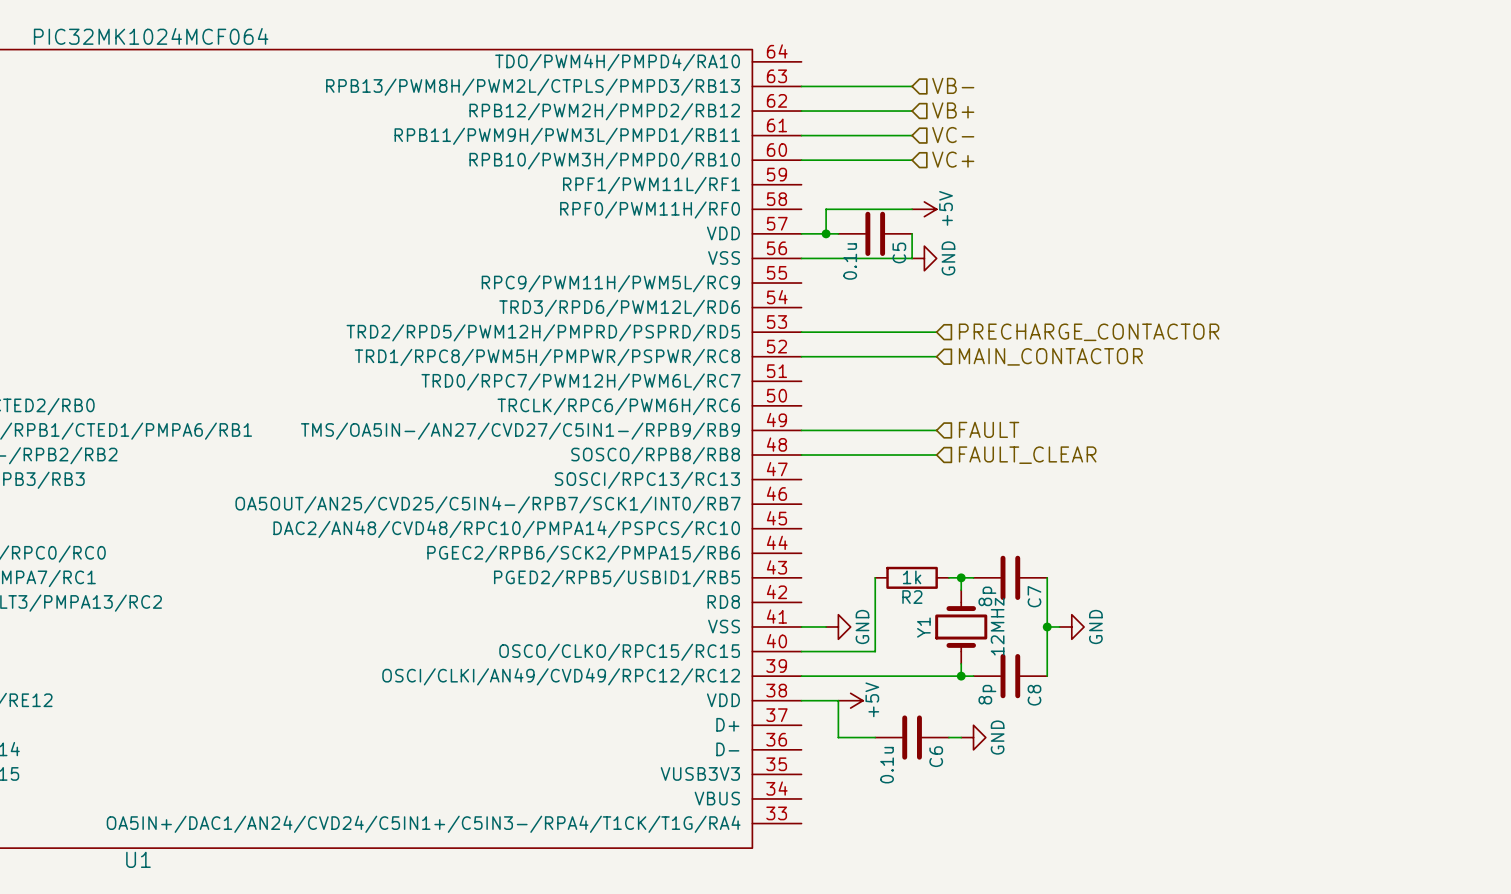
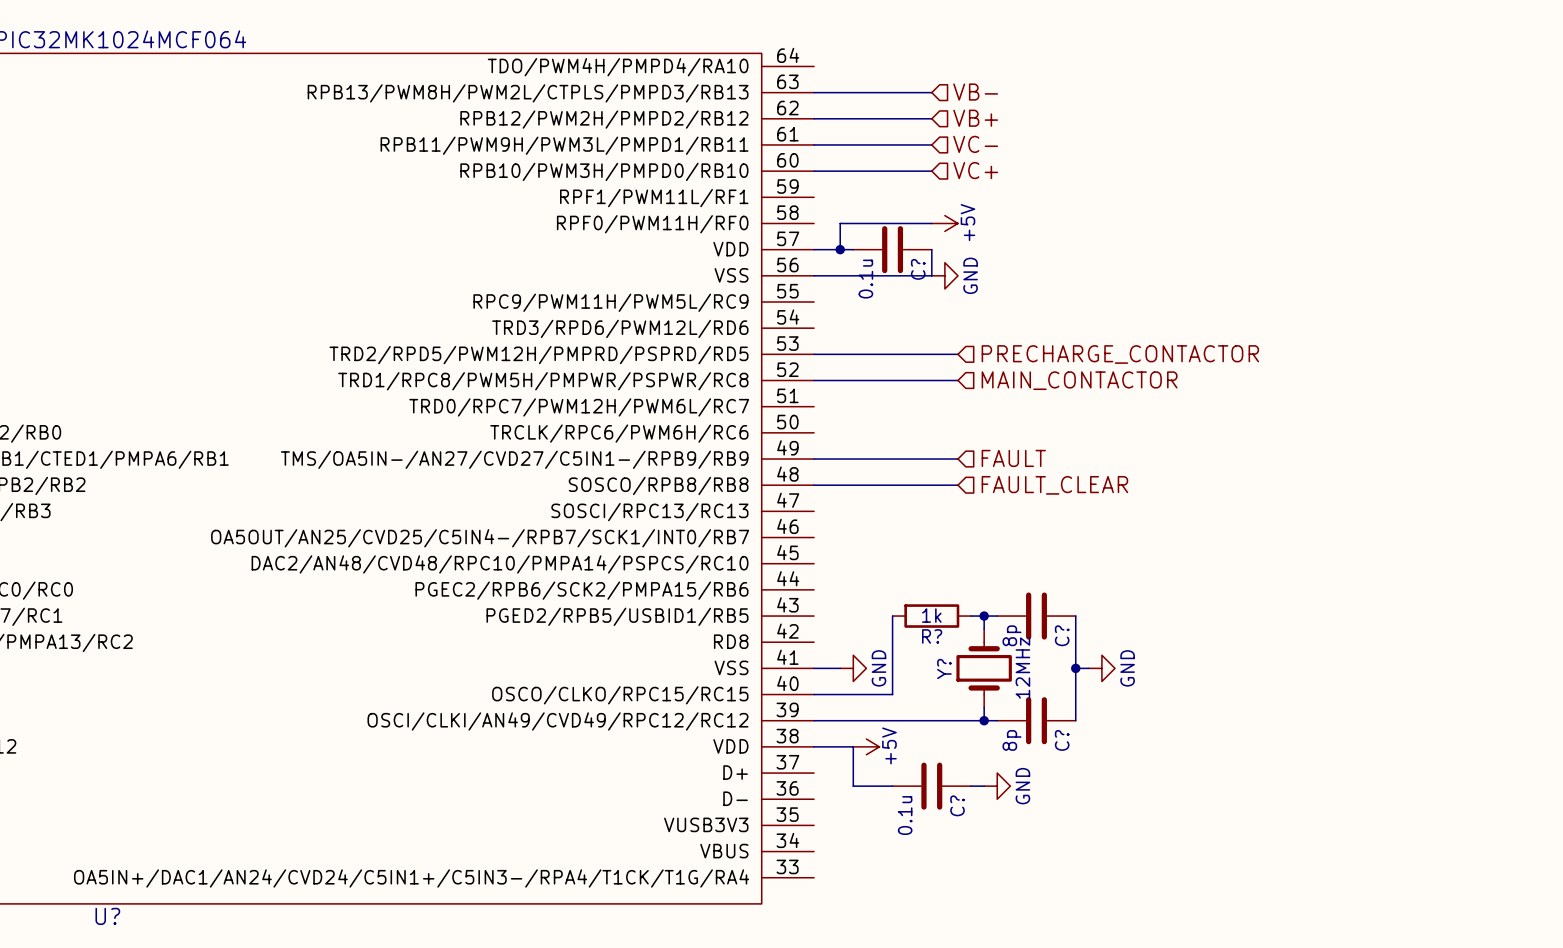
C5 name: C5 (899, 252) -> C? (918, 269)
C7 name: C7 (1034, 596) -> C? (1062, 635)
R2 name: R2 (912, 597) -> R? (932, 636)
Y1 name: Y1 (923, 627) -> Y? (944, 669)
C8 name: C8 (1034, 695) -> C? (1062, 740)
C6 name: C6 (936, 756) -> C? (957, 805)
U1 name: U1 (138, 859) -> U? (107, 916)

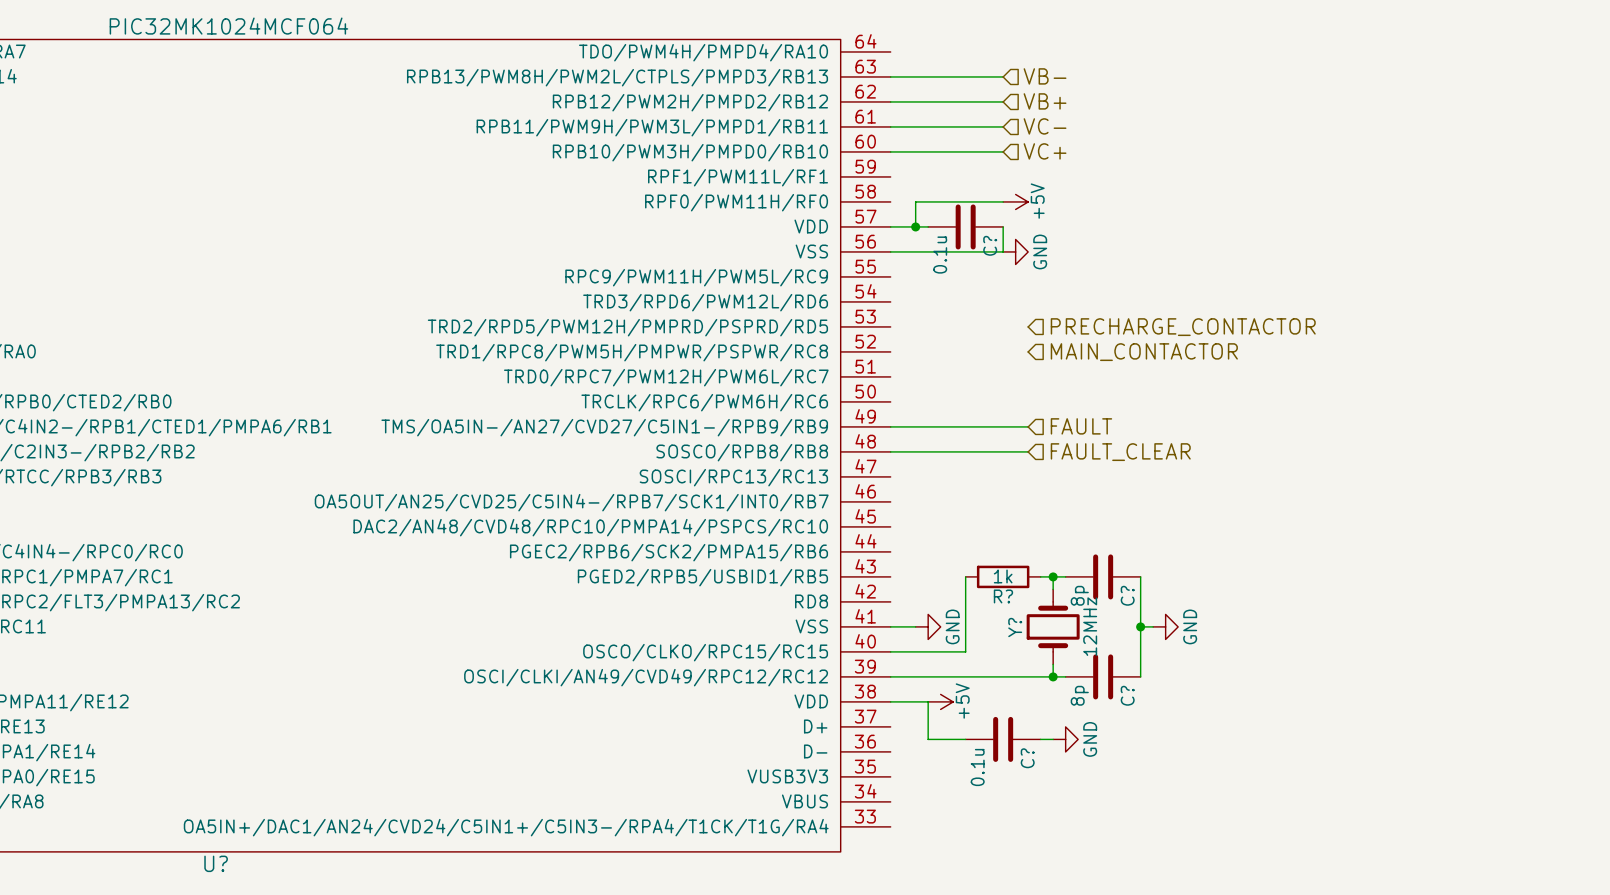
wire: (814, 354) (957, 354) -> none
wire: (814, 380) (957, 380) -> none

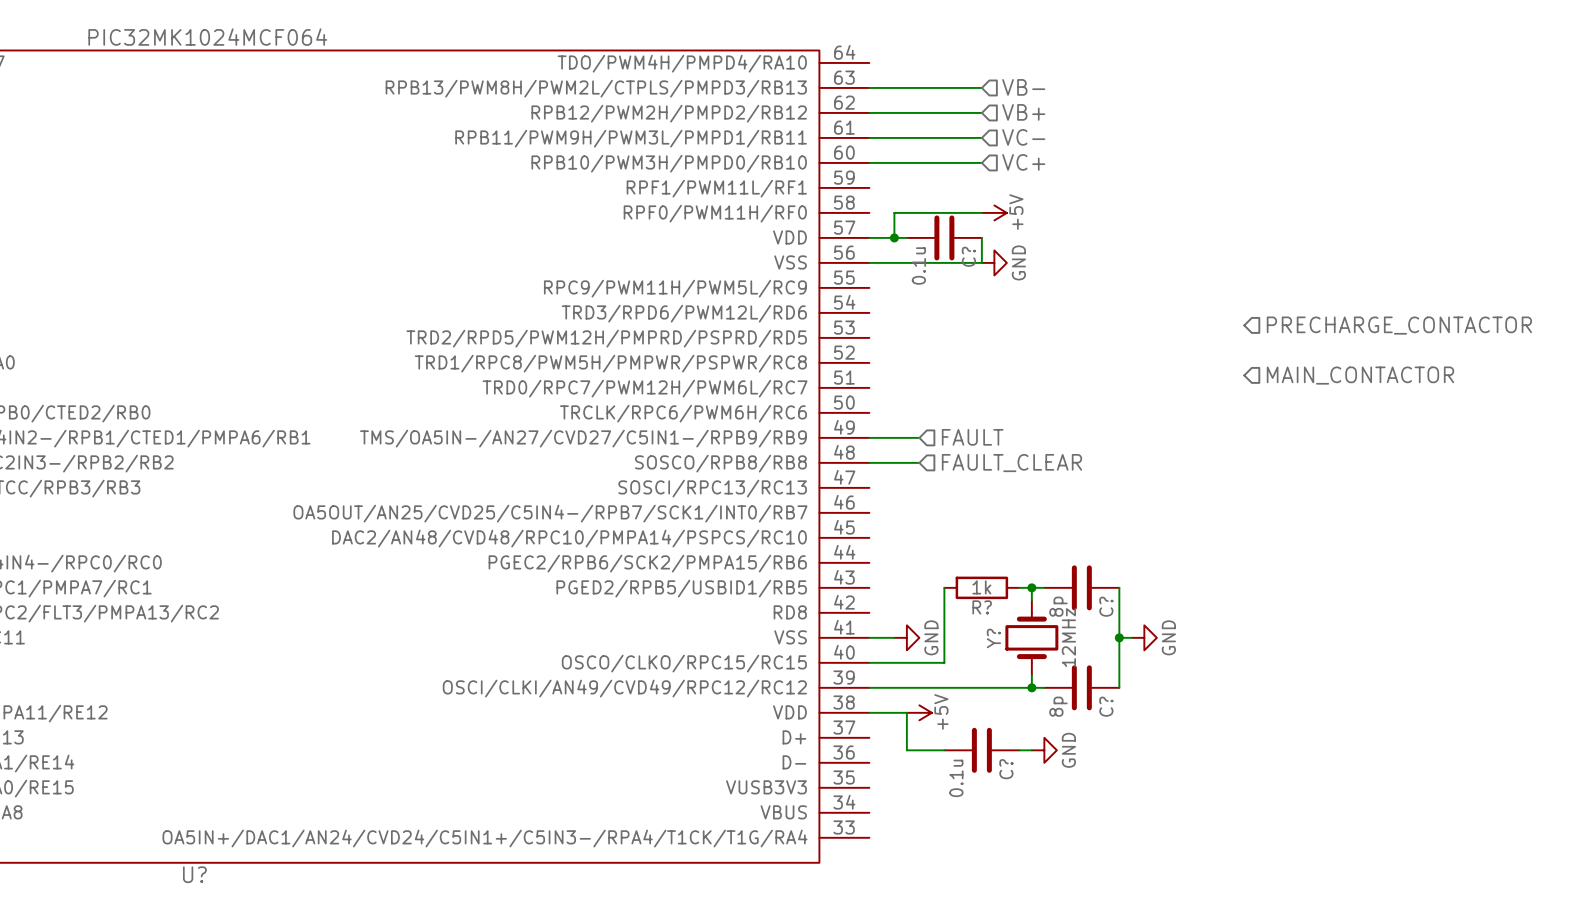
hierarchical label position: PRECHARGE_CONTACTOR (1183, 327) -> PRECHARGE_CONTACTOR (1399, 325)
hierarchical label position: MAIN_CONTACTOR (1144, 352) -> MAIN_CONTACTOR (1360, 375)
wire: (940, 426) (1028, 426) -> none
hierarchical label position: FAULT (1081, 426) -> FAULT (972, 437)
wire: (940, 451) (1028, 451) -> none
hierarchical label position: FAULT_CLEAR (1120, 452) -> FAULT_CLEAR (1011, 463)

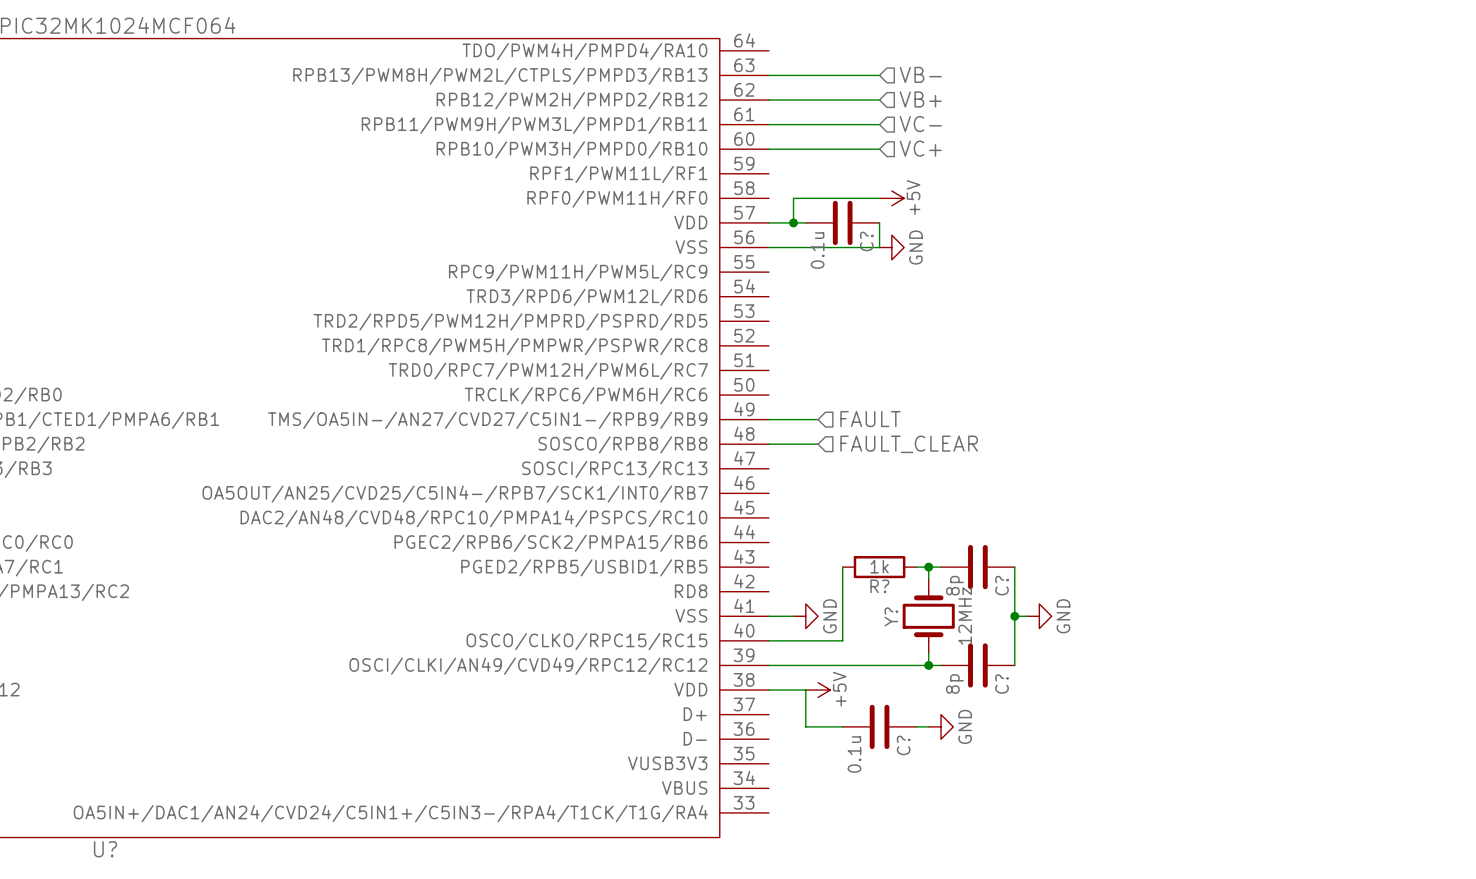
hierarchical label: PRECHARGE_CONTACTOR (1399, 325) -> none
hierarchical label: MAIN_CONTACTOR (1360, 375) -> none

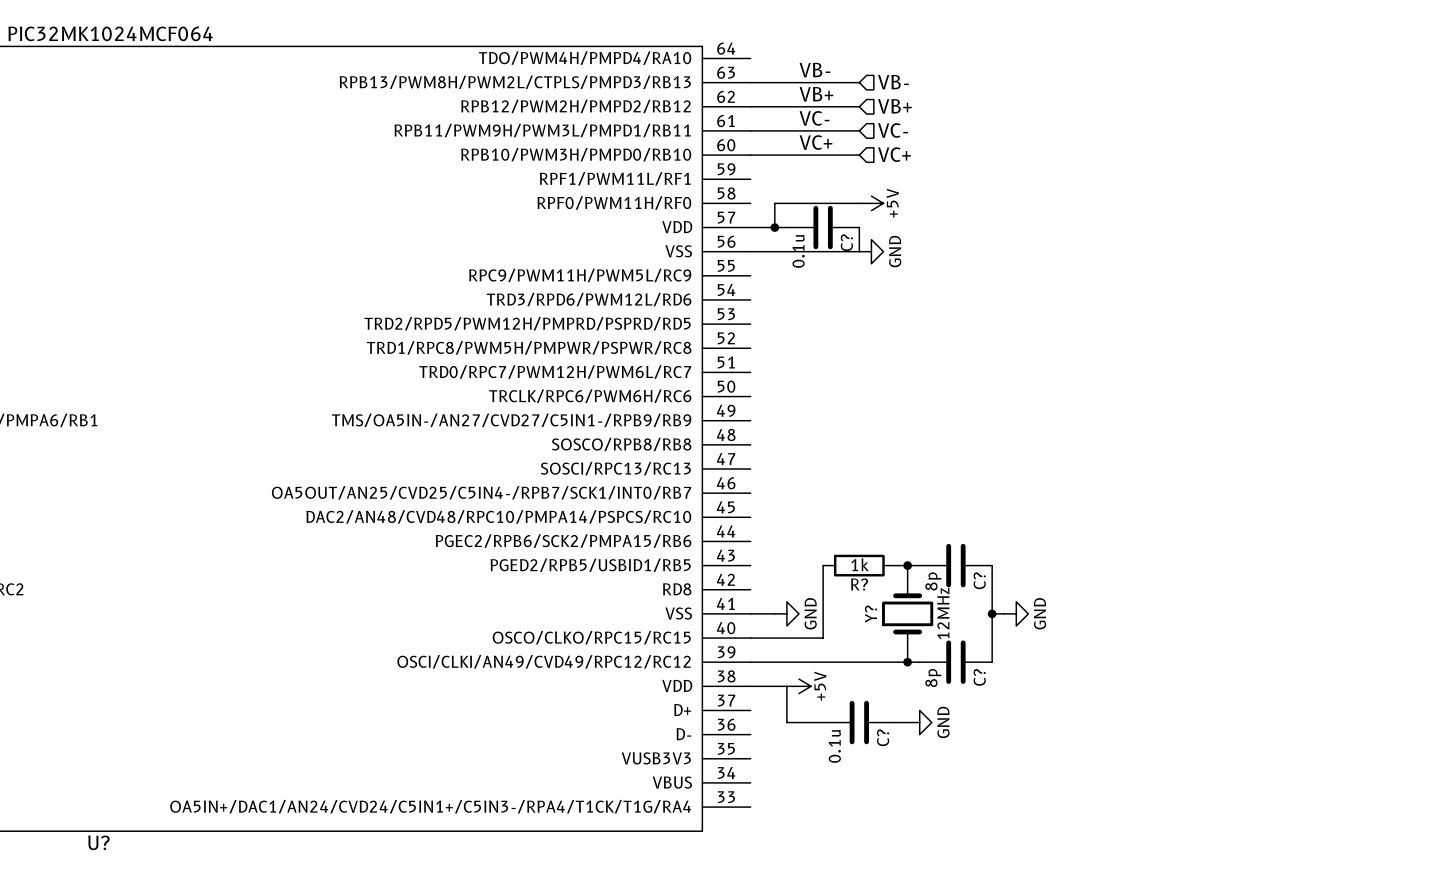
label: none -> VB- (815, 70)
label: none -> VB+ (816, 94)
label: none -> VC- (814, 118)
label: none -> VC+ (815, 142)
wire: (768, 419) (818, 419) -> none
hierarchical label: FAULT (870, 419) -> none
wire: (768, 444) (818, 444) -> none
hierarchical label: FAULT_CLEAR (909, 444) -> none

